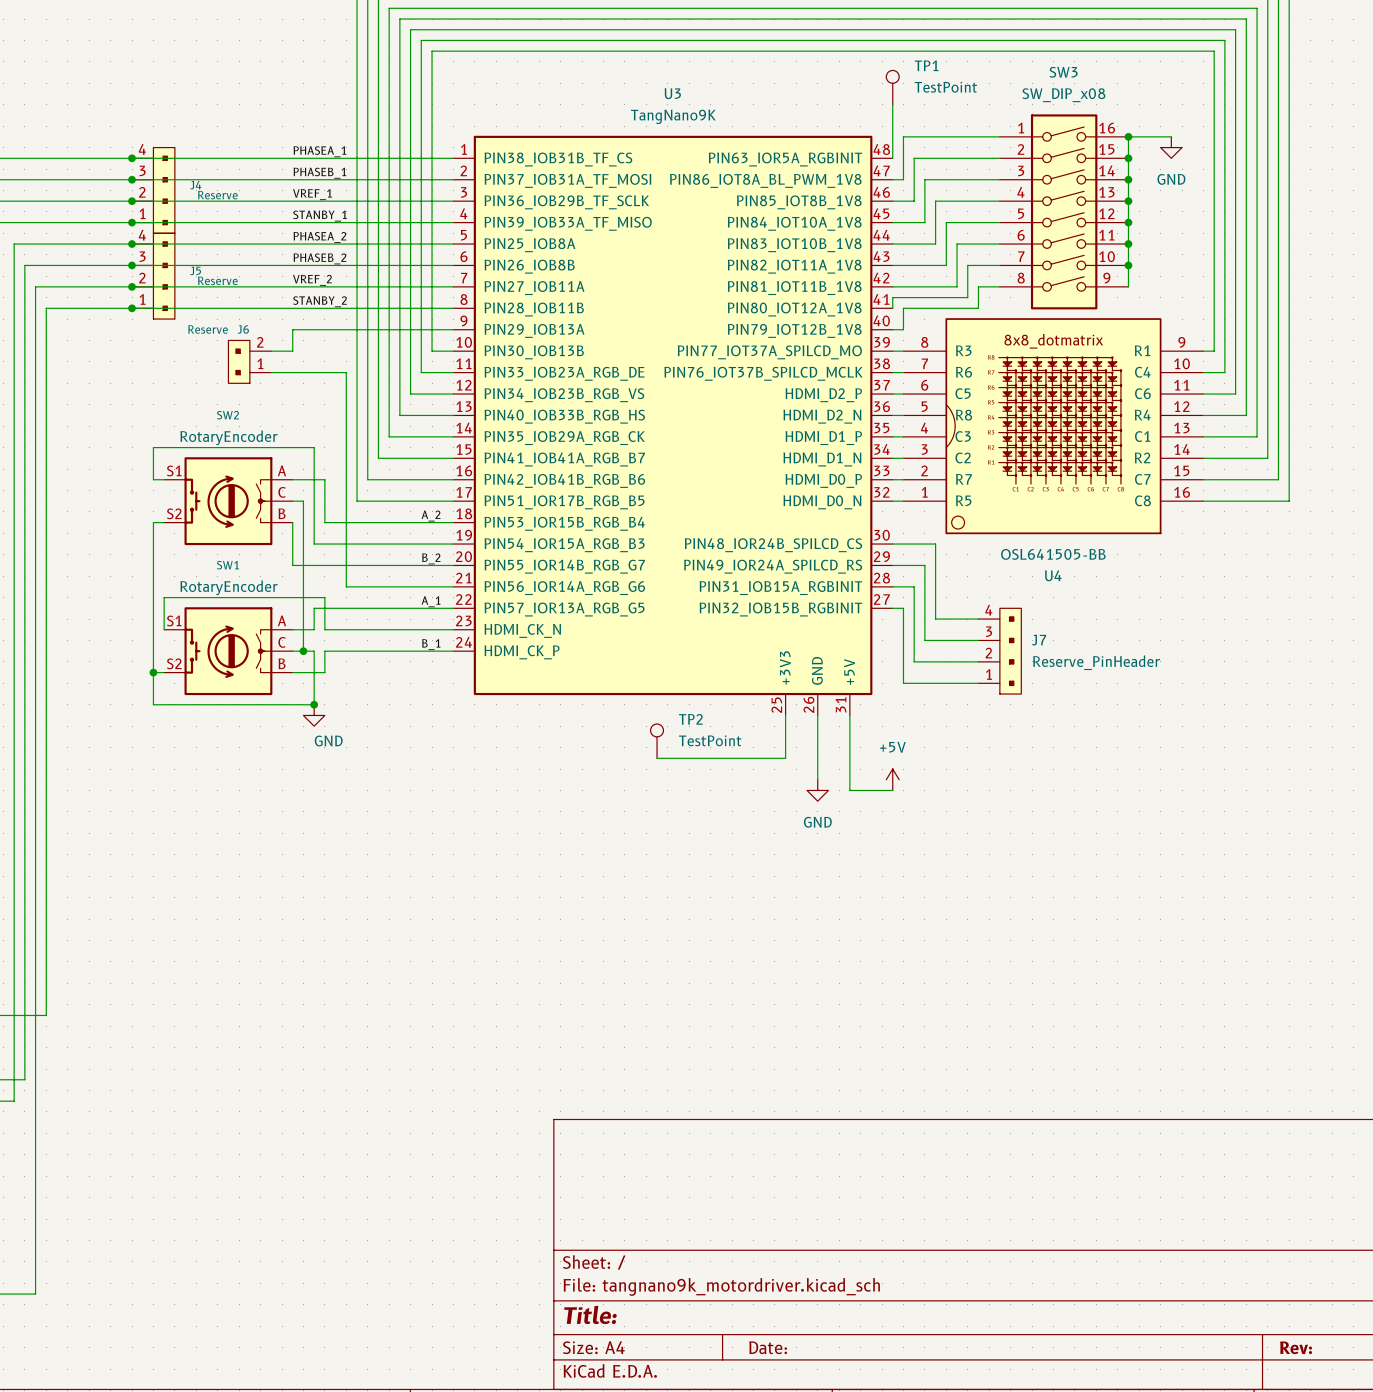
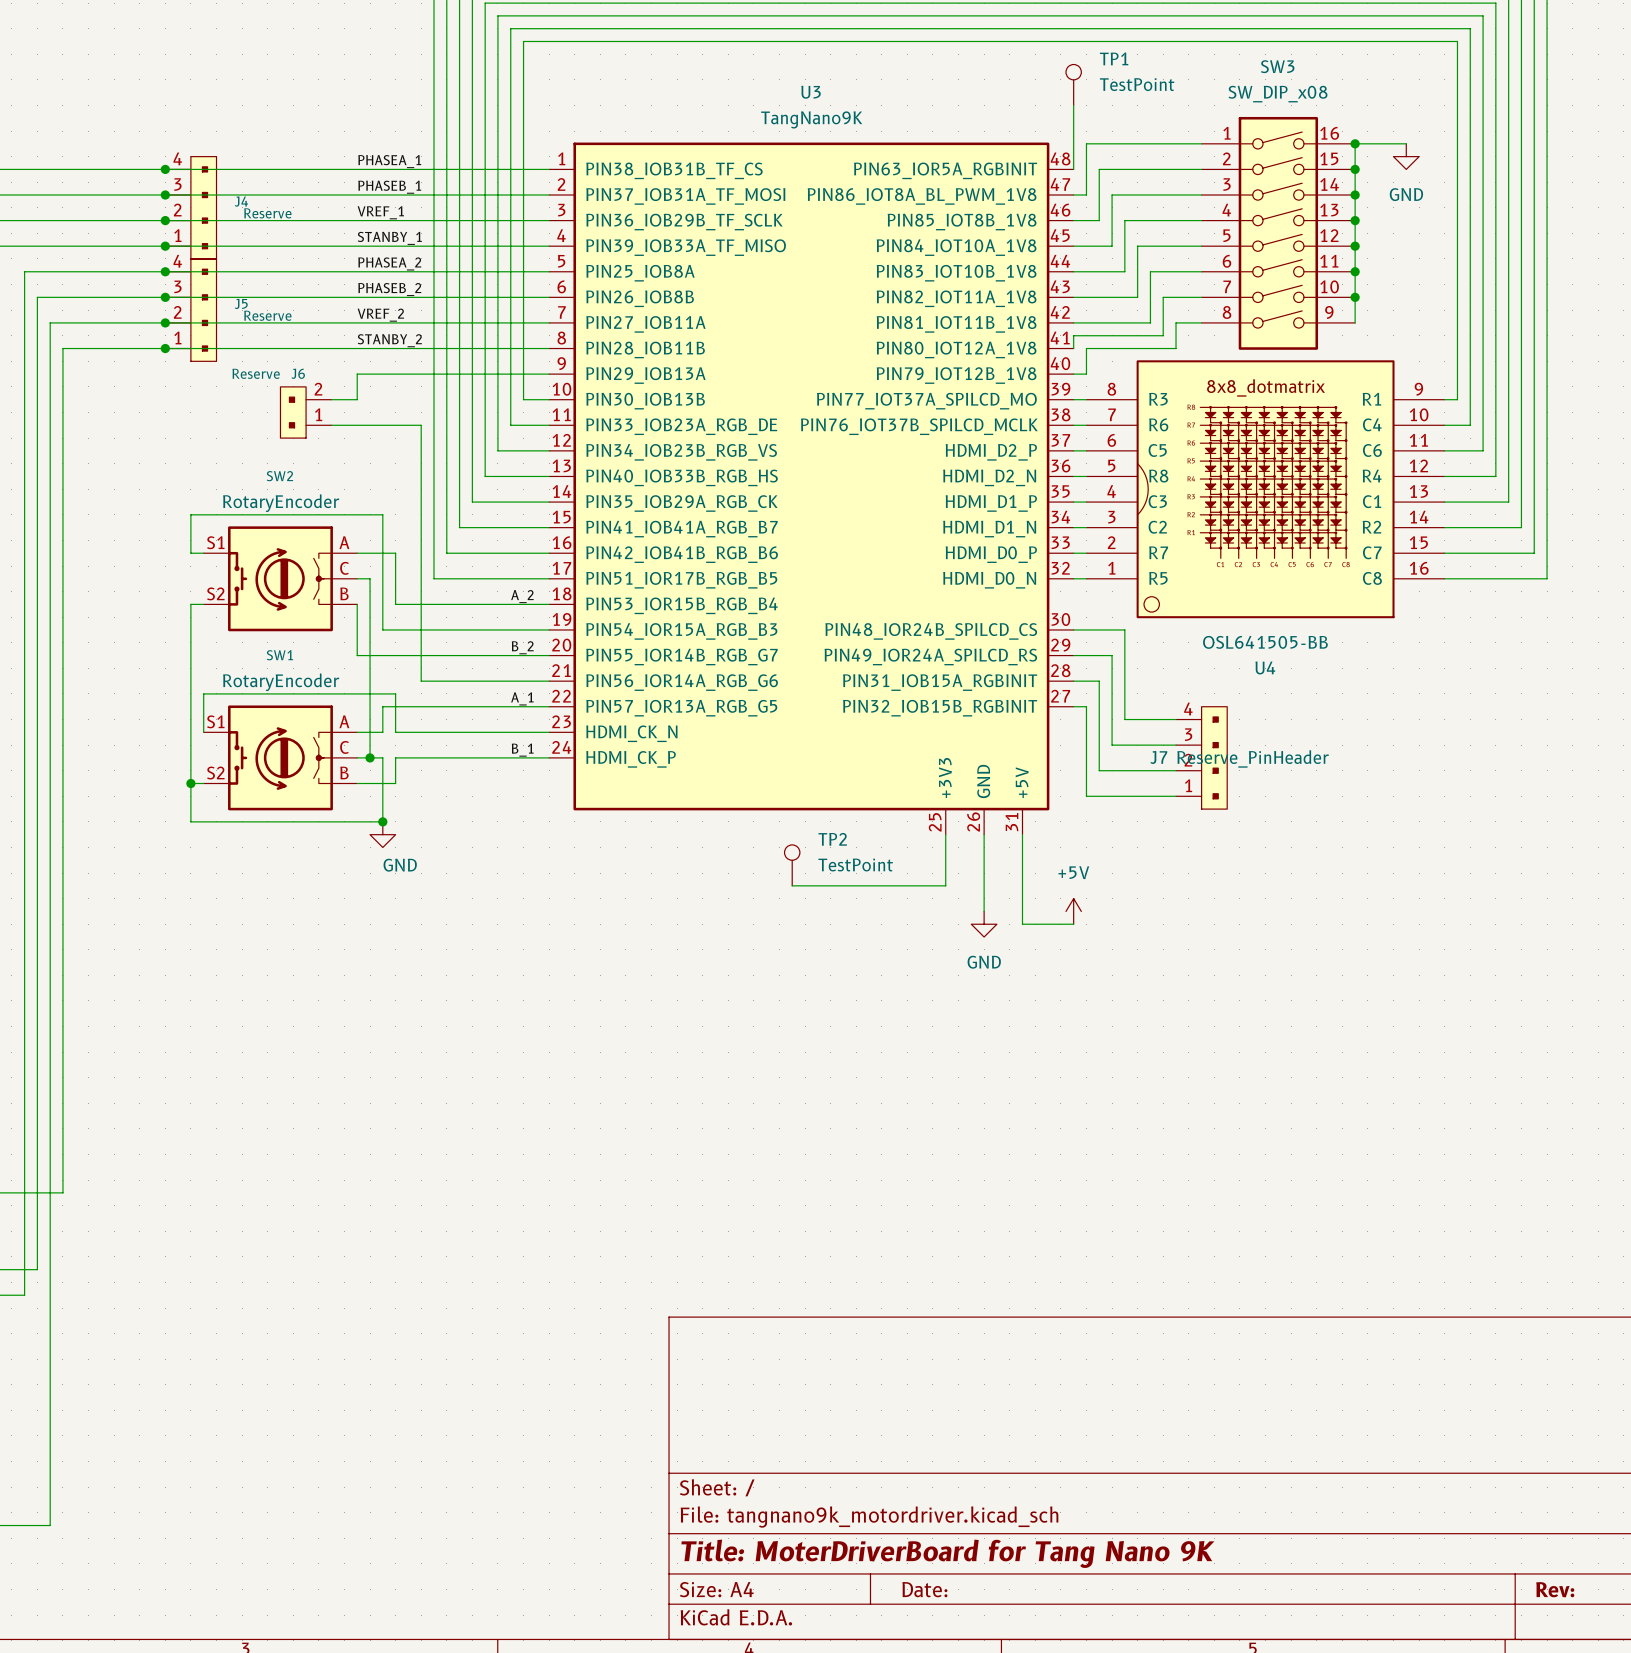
J7 name position: J7 (1039, 640) -> J7 (1158, 757)
J7 value position: Reserve_PinHeader (1096, 662) -> Reserve_PinHeader (1253, 758)
title block: Title: (590, 1314) -> Title: MoterDriverBoard for Tang Nano 9K (947, 1553)

